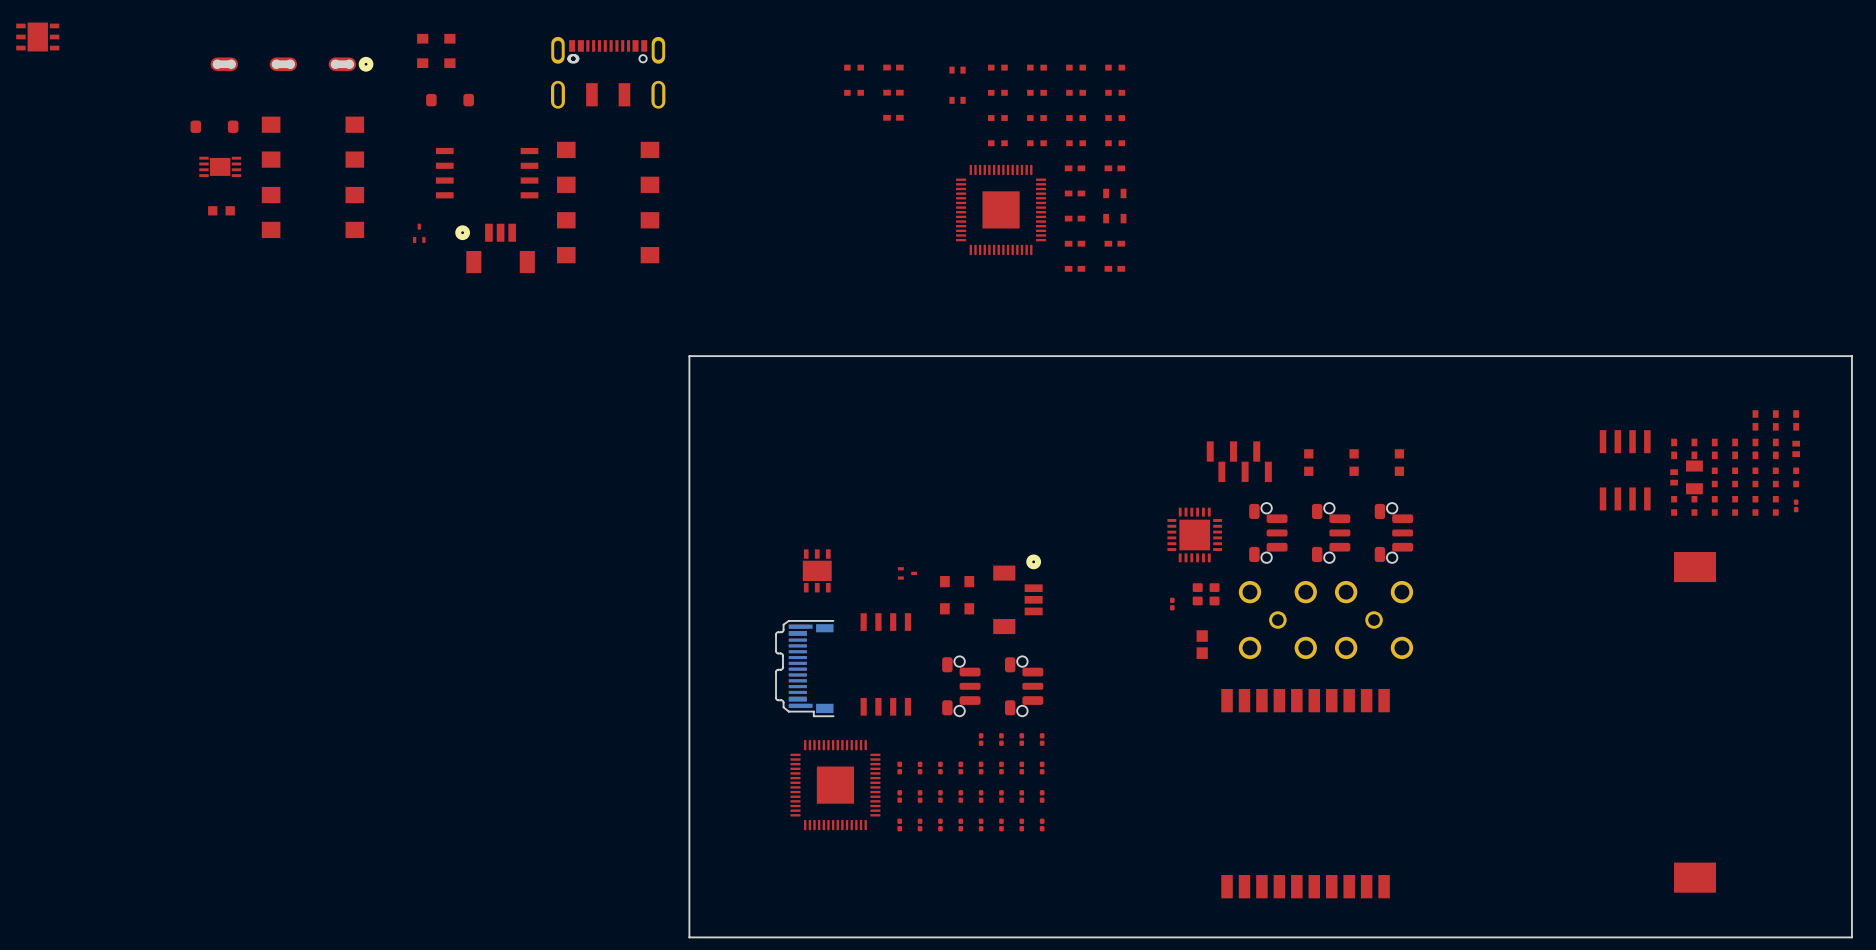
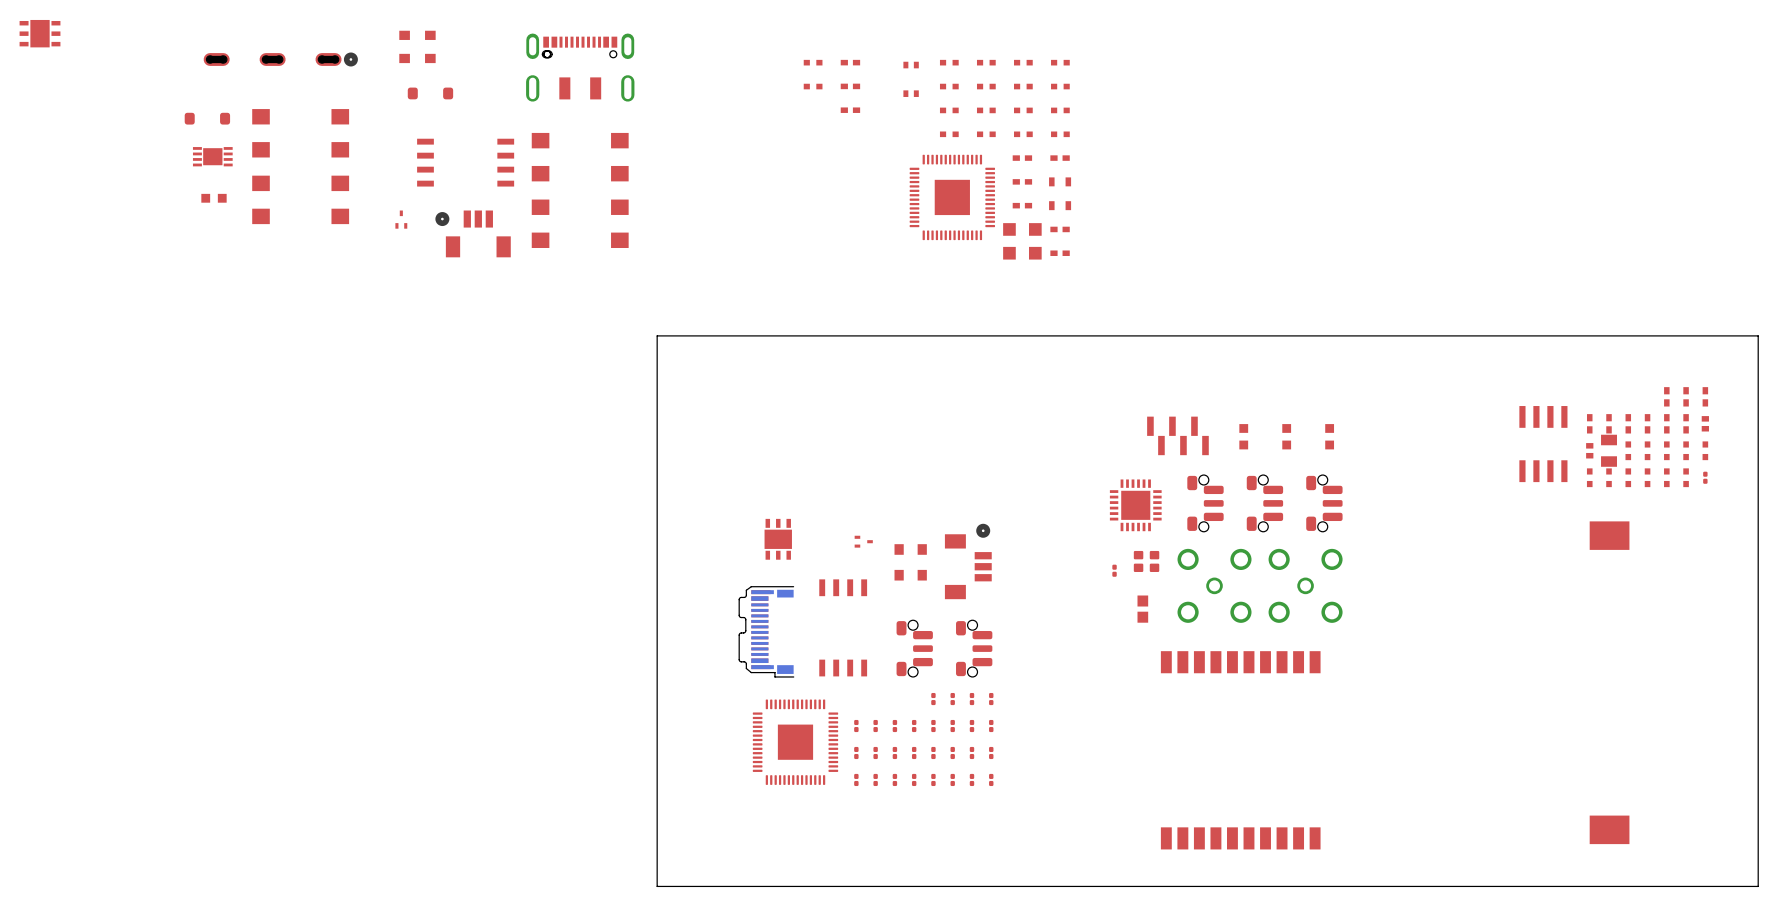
part footprint: [1064, 240, 1086, 247] -> [1003, 223, 1042, 236]
part footprint: [1064, 265, 1086, 272] -> [1003, 246, 1042, 260]

